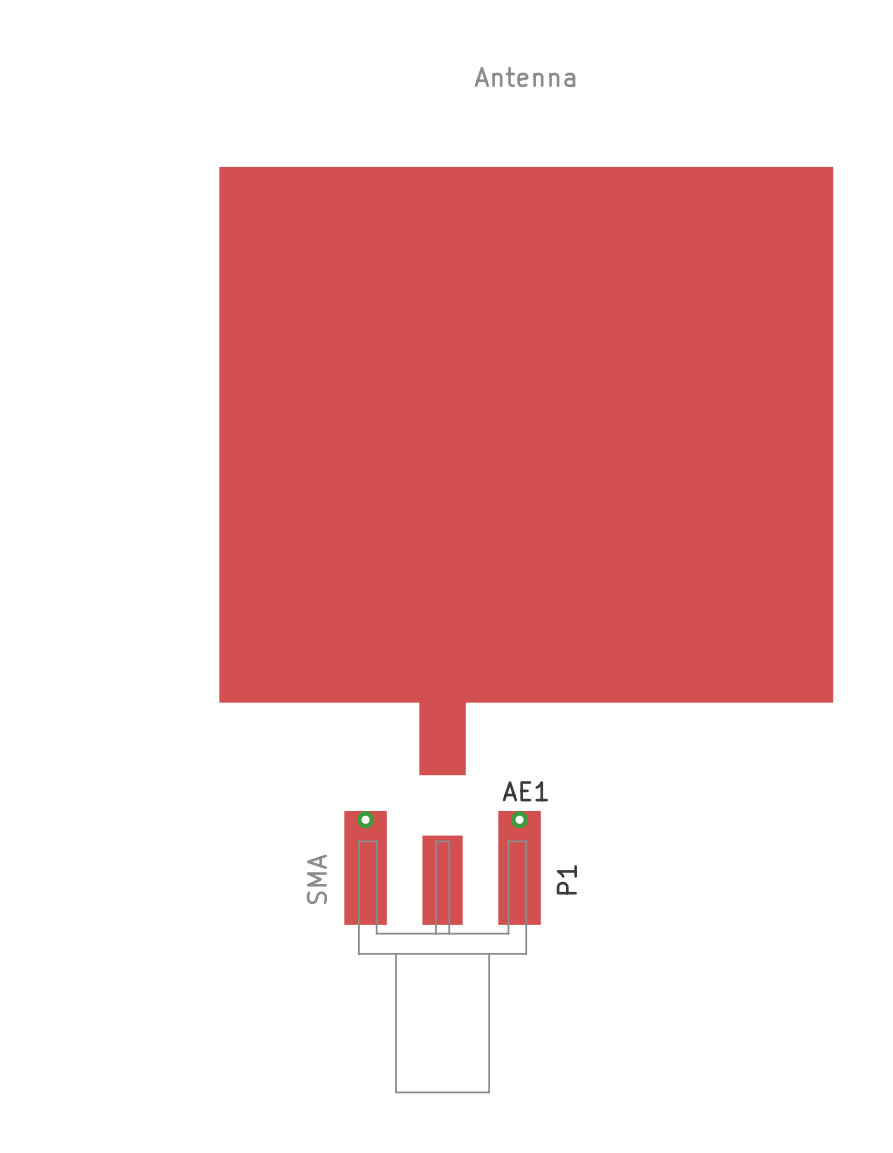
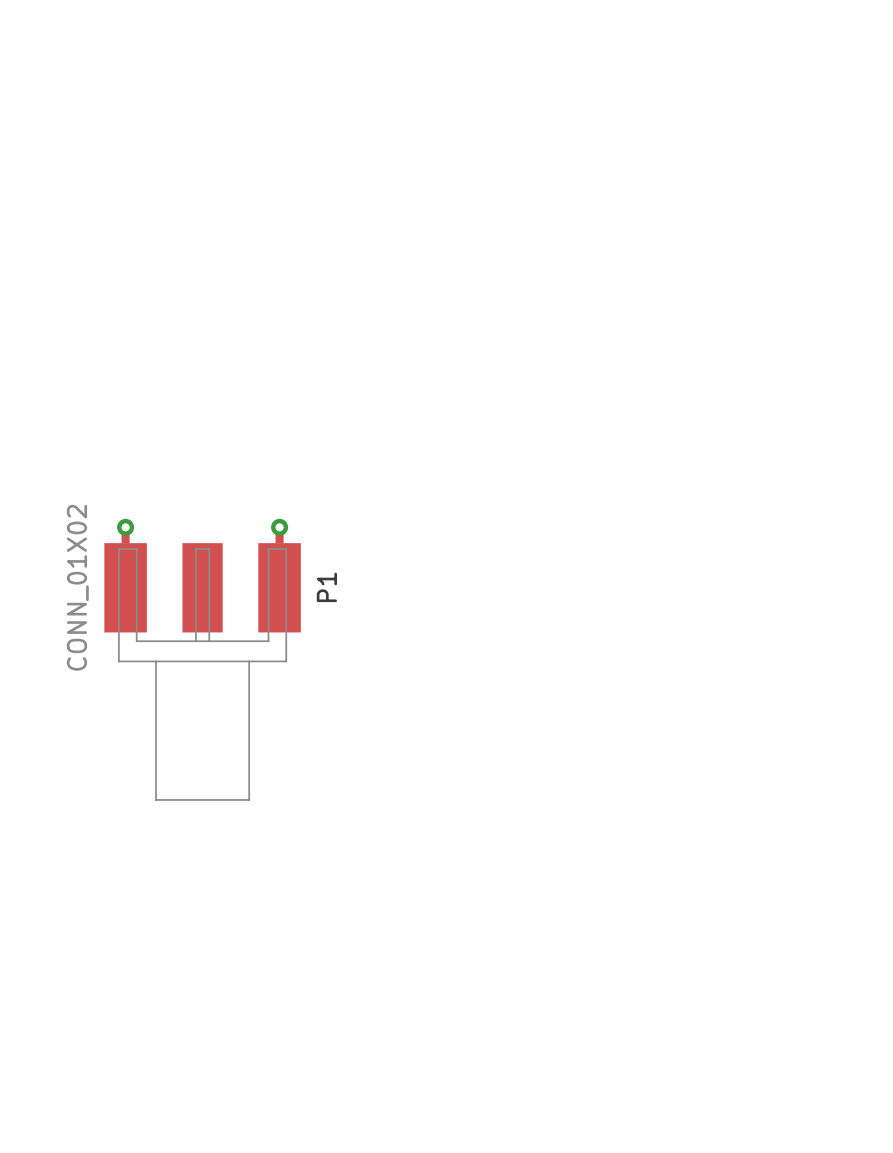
AE1: Antenna (526, 471) -> none
P1 footprint: [344, 810, 541, 1094] -> [104, 518, 301, 801]
P1 value: SMA (316, 879) -> CONN_01X02 (77, 587)

